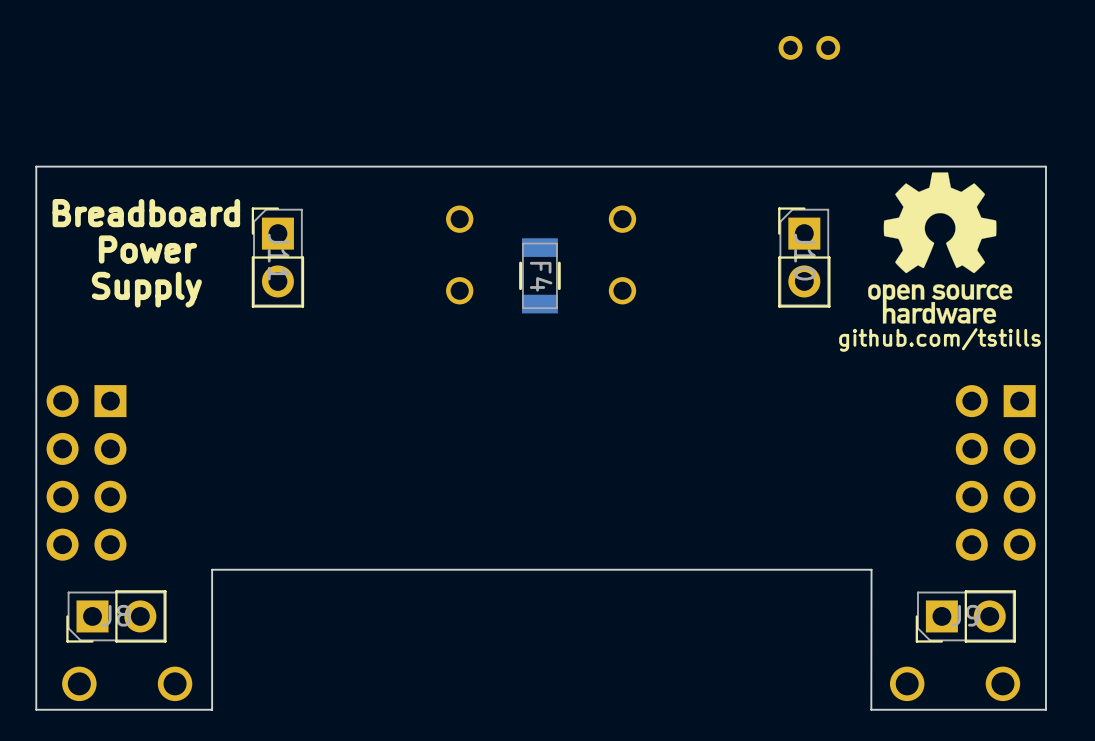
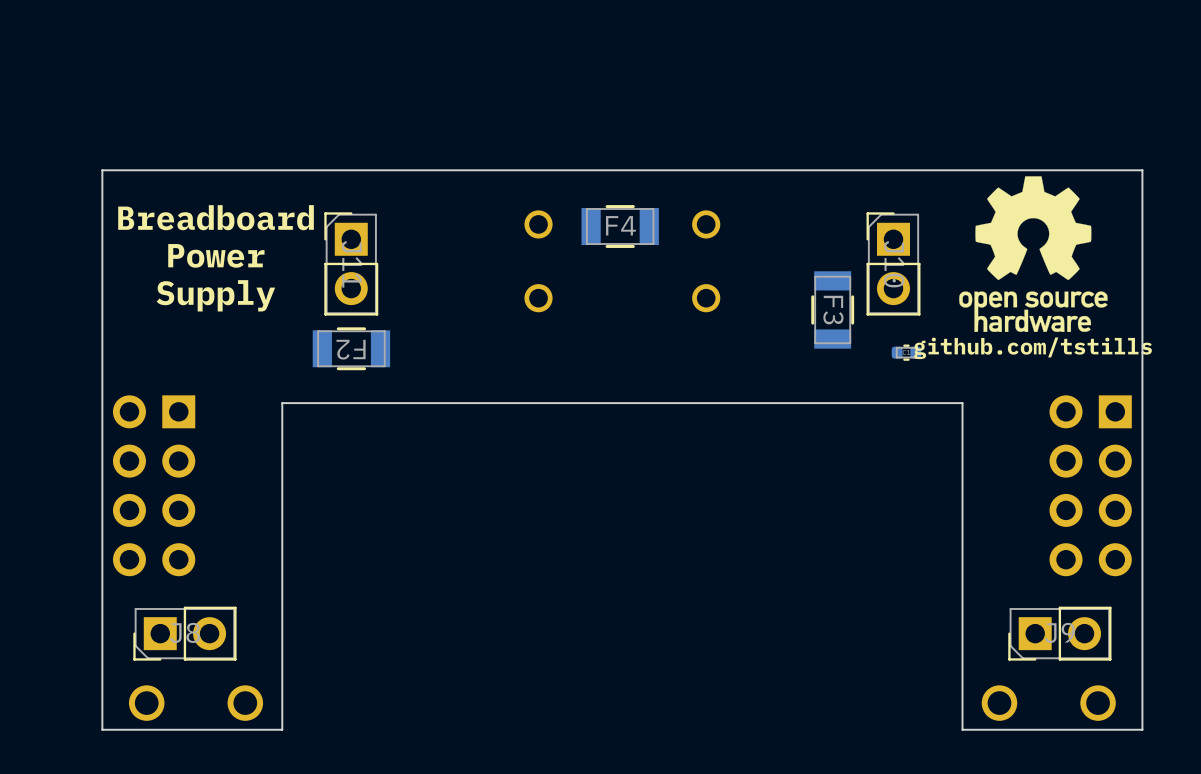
part: (809, 47) -> none
F4 rotation: 0° (539, 275) -> 90° counterclockwise (620, 226)
F4 position: (539, 275) -> (620, 226)
F3: none -> (832, 309)
F2: none -> (351, 348)
part: none -> (906, 352)
board edge: (871, 709) (871, 569) (212, 569) (210, 709) -> (962, 729) (962, 403) (282, 403) (282, 729)

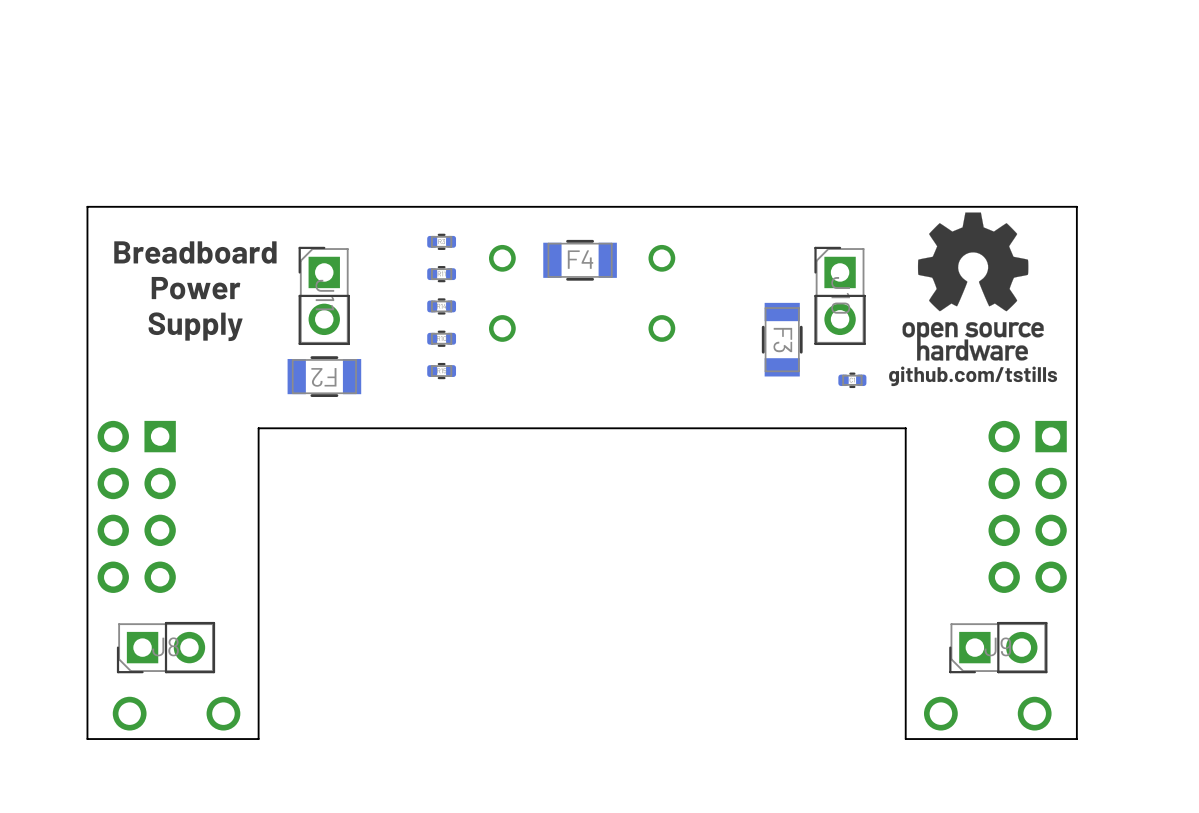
part: none -> (441, 241)
part: none -> (441, 274)
part: none -> (441, 306)
part: none -> (441, 338)
part: none -> (441, 371)

